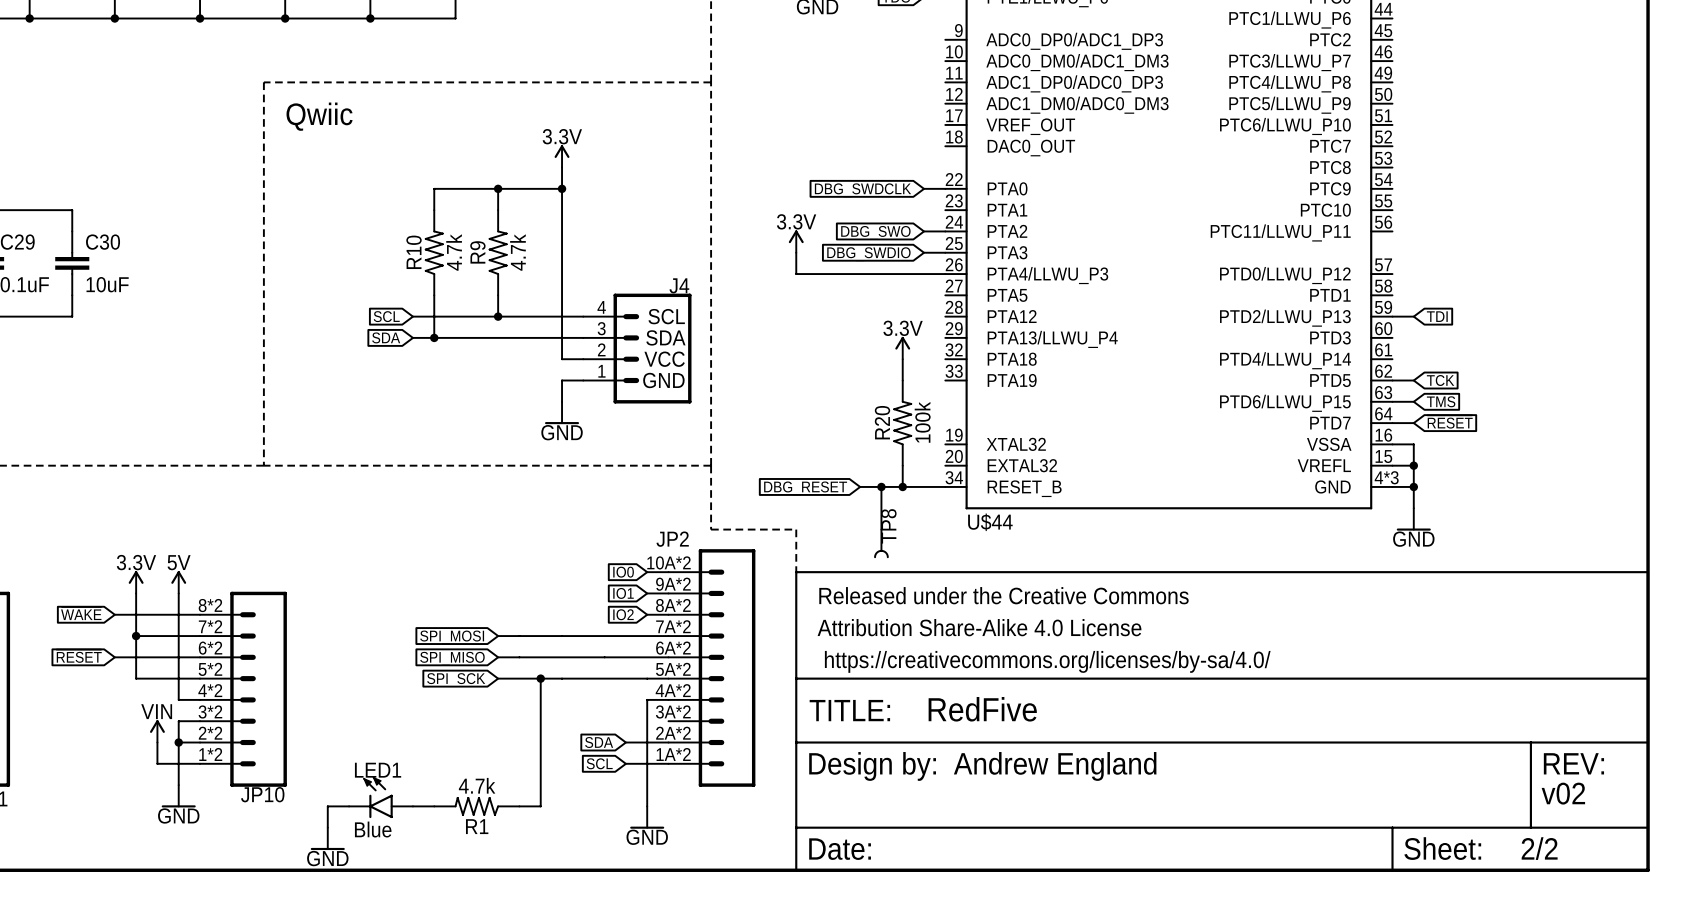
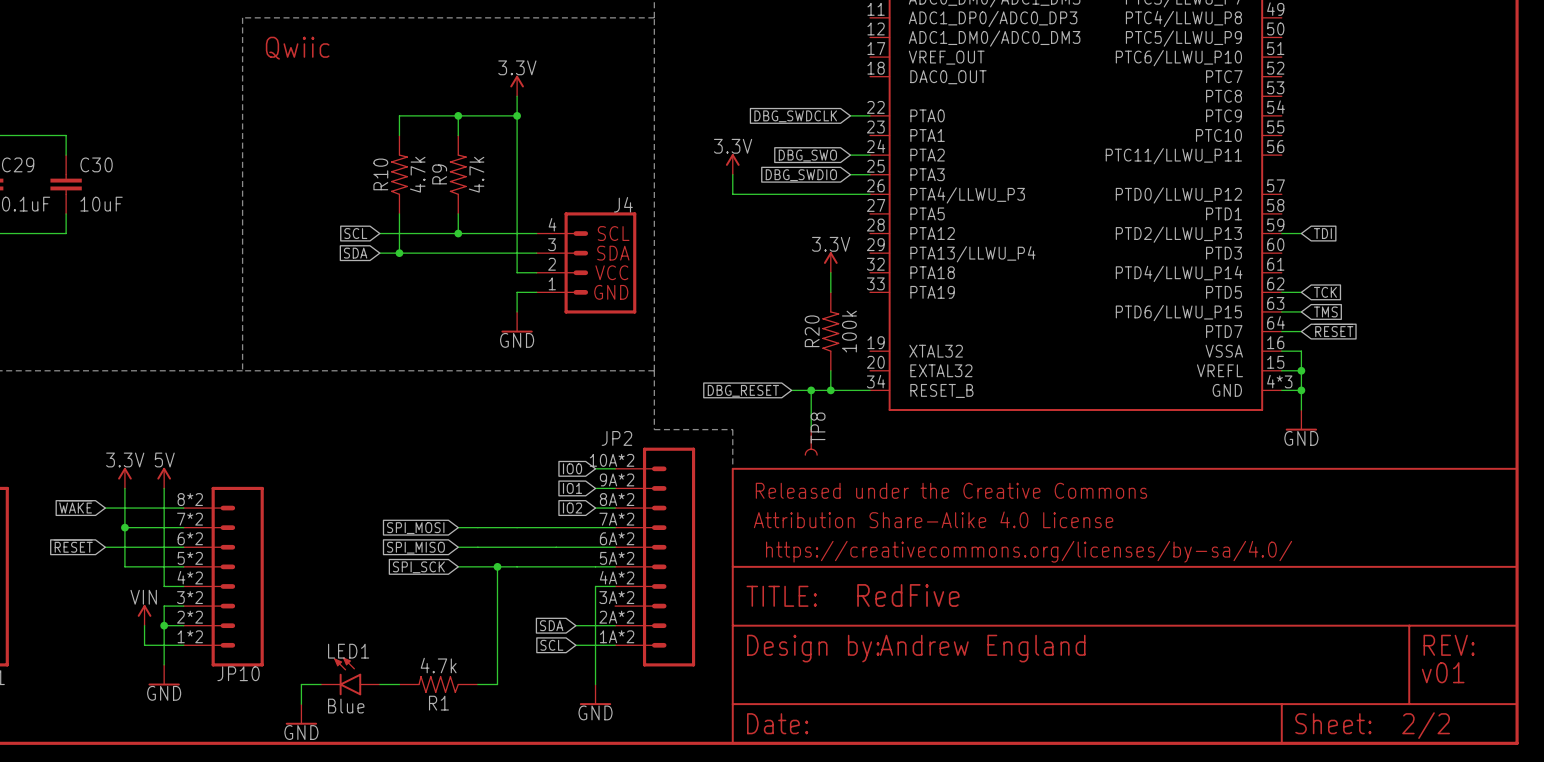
U$44 name: U$44 (990, 522) -> none
text: v02 (1563, 793) -> v01 (1443, 672)

